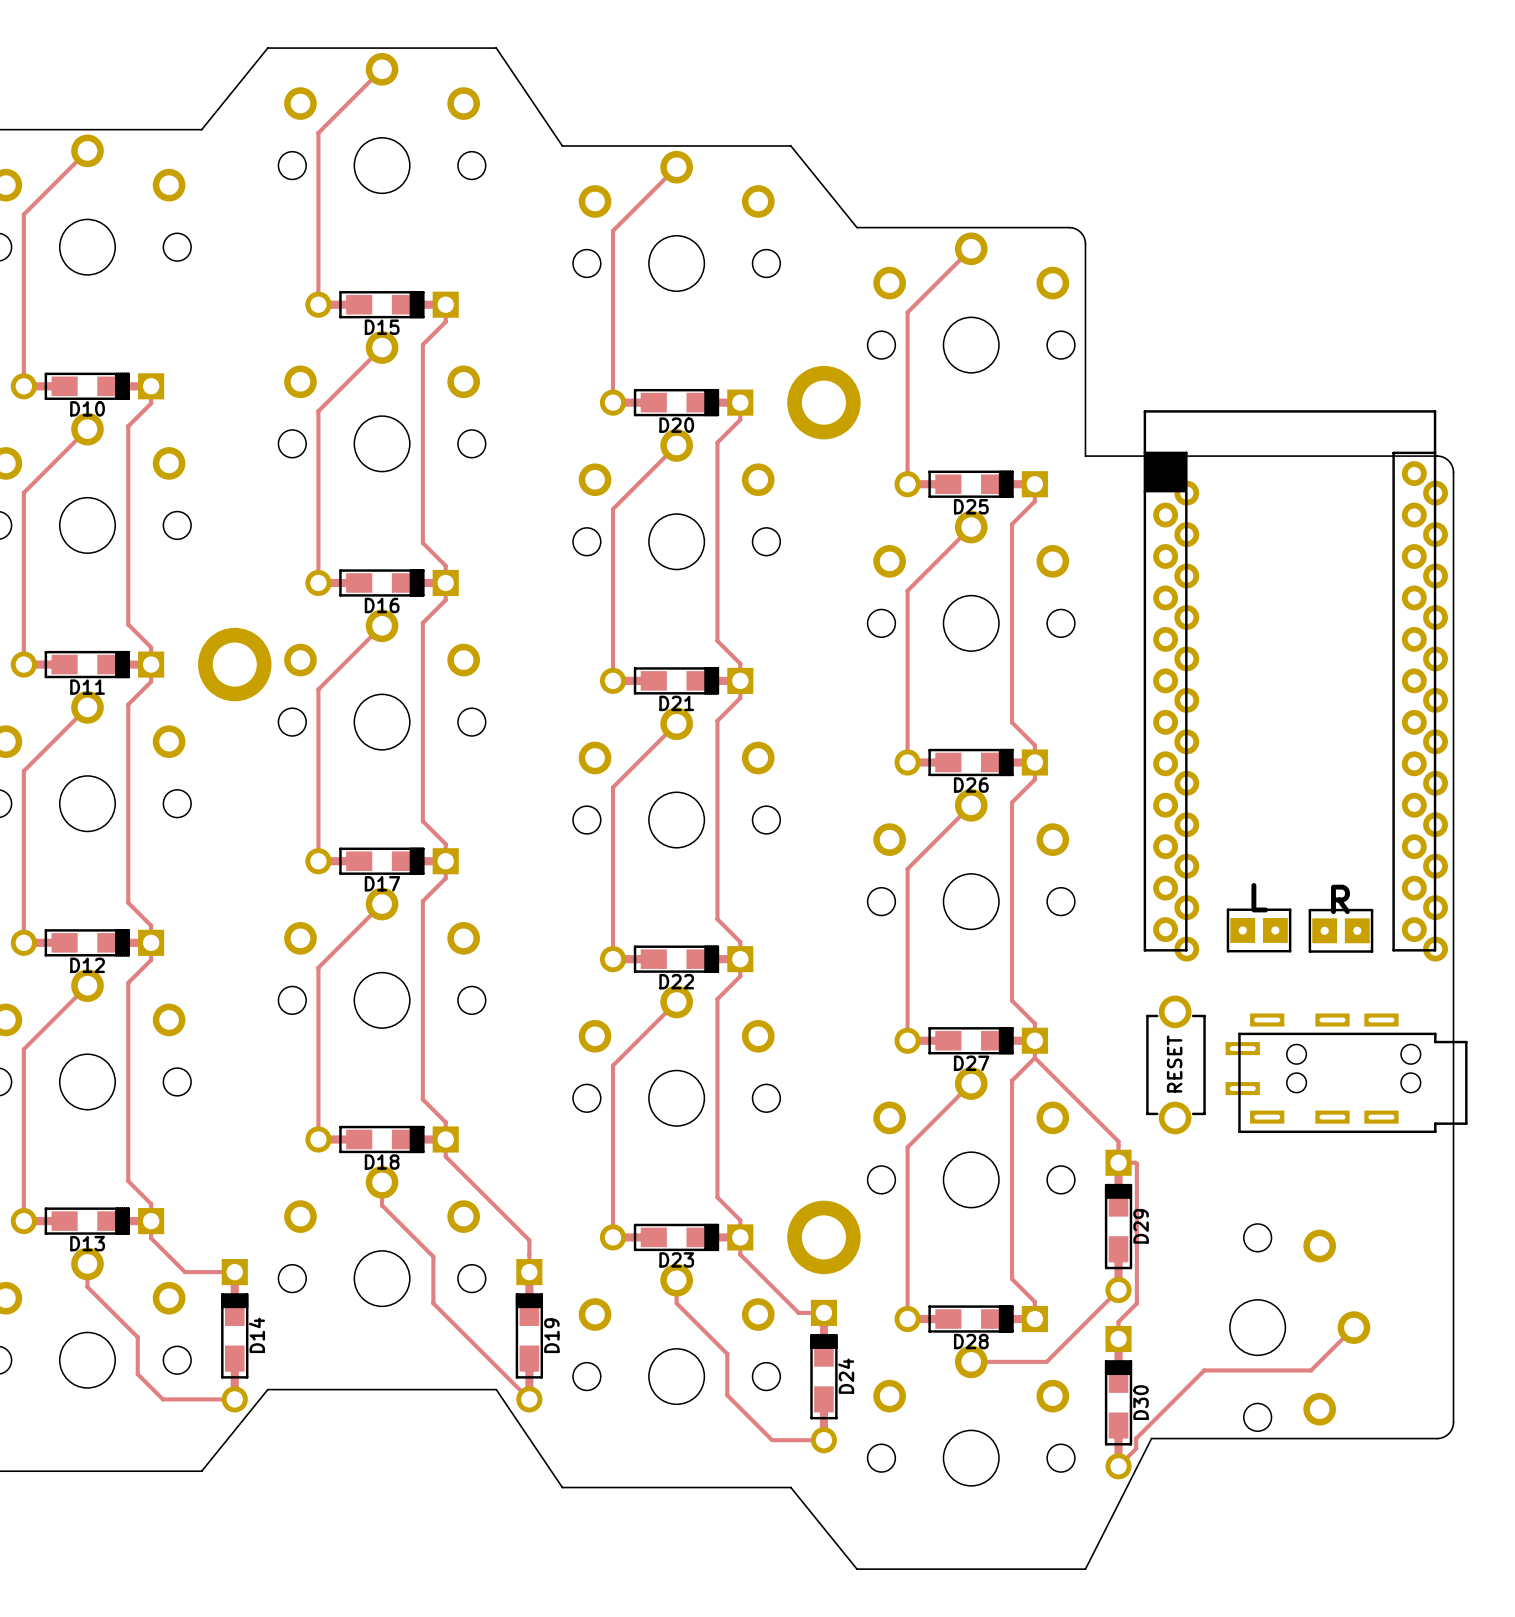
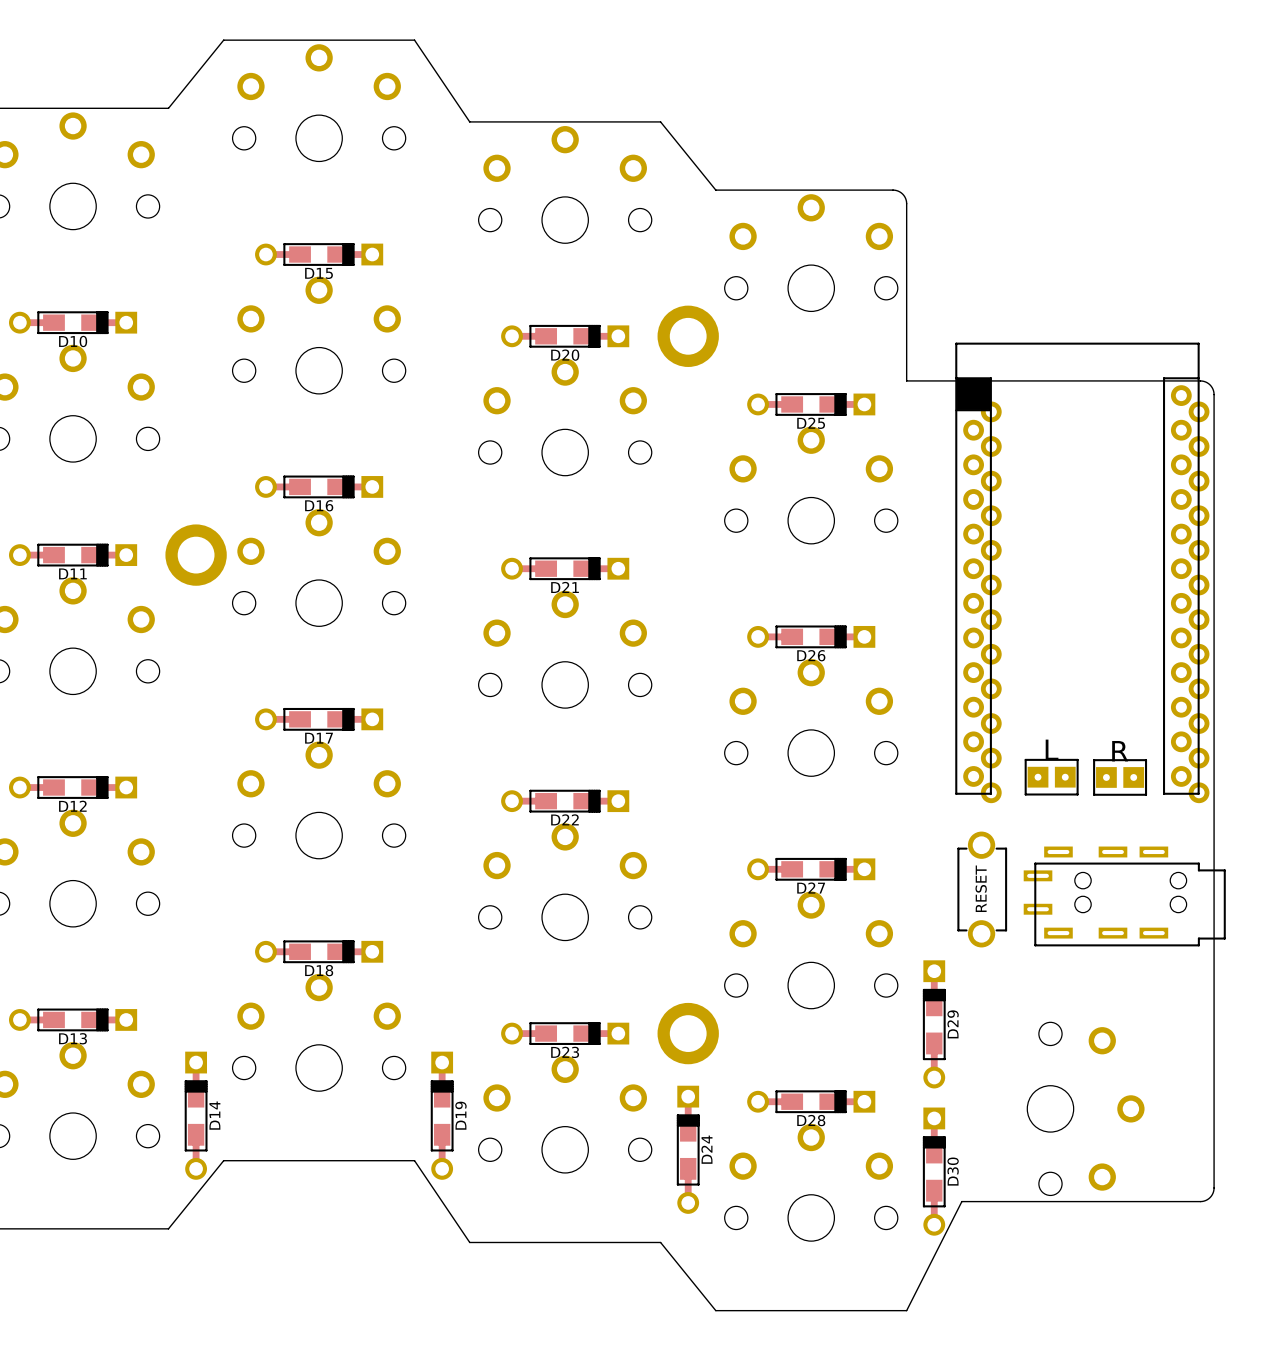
track: (382, 69) (318, 132) (318, 304) -> none
track: (87, 150) (23, 214) (23, 386) -> none
track: (676, 167) (613, 230) (613, 402) -> none
track: (971, 248) (907, 312) (907, 484) -> none
track: (445, 304) (445, 321) (422, 344) (422, 542) (445, 565) (445, 600) (422, 622) (422, 821) (445, 844) (445, 878) (422, 901) (422, 1099) (445, 1122) (445, 1156) (529, 1240) (529, 1272) -> none
track: (382, 347) (318, 411) (318, 582) -> none
track: (151, 386) (151, 403) (128, 426) (128, 624) (151, 647) (151, 681) (128, 704) (128, 902) (151, 925) (151, 959) (128, 982) (128, 1181) (151, 1203) (151, 1238) (184, 1272) (234, 1272) -> none
track: (740, 402) (740, 419) (717, 442) (717, 640) (740, 663) (740, 698) (717, 720) (717, 919) (740, 942) (740, 976) (717, 999) (717, 1197) (740, 1220) (740, 1254) (798, 1312) (823, 1312) -> none
track: (87, 429) (23, 492) (23, 664) -> none
track: (676, 445) (613, 509) (613, 680) -> none
track: (1034, 484) (1034, 501) (1012, 524) (1012, 722) (1034, 745) (1034, 779) (1012, 802) (1012, 1000) (1034, 1023) (1034, 1057) -> none
track: (971, 527) (907, 590) (907, 762) -> none
track: (382, 625) (318, 689) (318, 861) -> none
track: (87, 707) (23, 771) (23, 942) -> none
track: (676, 723) (613, 787) (613, 959) -> none
track: (971, 805) (907, 868) (907, 1040) -> none
track: (382, 904) (318, 967) (318, 1139) -> none
track: (87, 985) (23, 1049) (23, 1221) -> none
track: (676, 1002) (613, 1065) (613, 1237) -> none
track: (1034, 1057) (1012, 1080) (1012, 1279) (1034, 1301) (1034, 1319) -> none
track: (1034, 1057) (1118, 1141) (1118, 1162) (1136, 1163) (1136, 1303) (1118, 1321) (1118, 1339) -> none
track: (971, 1083) (907, 1147) (907, 1319) -> none
track: (382, 1182) (382, 1205) (433, 1256) (433, 1303) (529, 1399) -> none
track: (87, 1263) (87, 1287) (137, 1337) (137, 1374) (162, 1399) (234, 1399) -> none
track: (676, 1280) (676, 1303) (727, 1353) (727, 1395) (772, 1440) (823, 1440) -> none
track: (1118, 1290) (1046, 1361) (971, 1361) -> none
track: (1353, 1327) (1311, 1370) (1204, 1370) (1136, 1438) (1136, 1448) (1118, 1466) -> none

